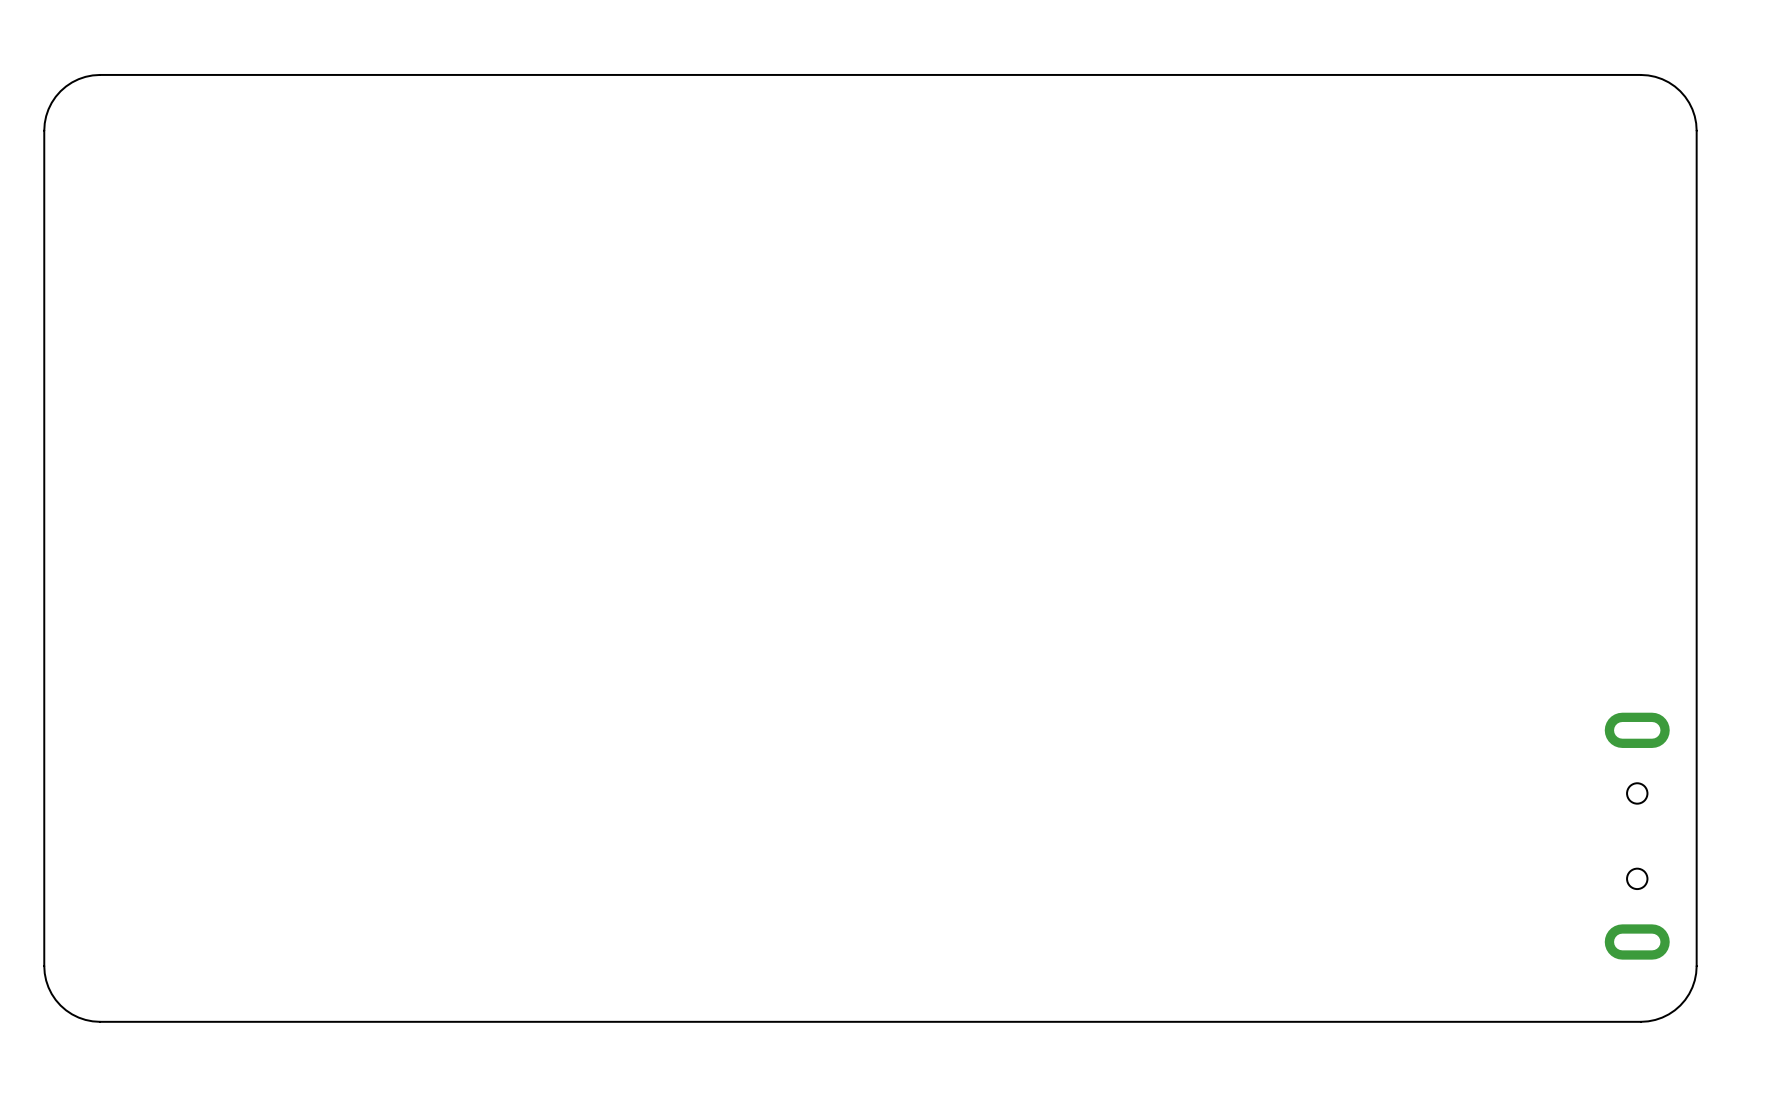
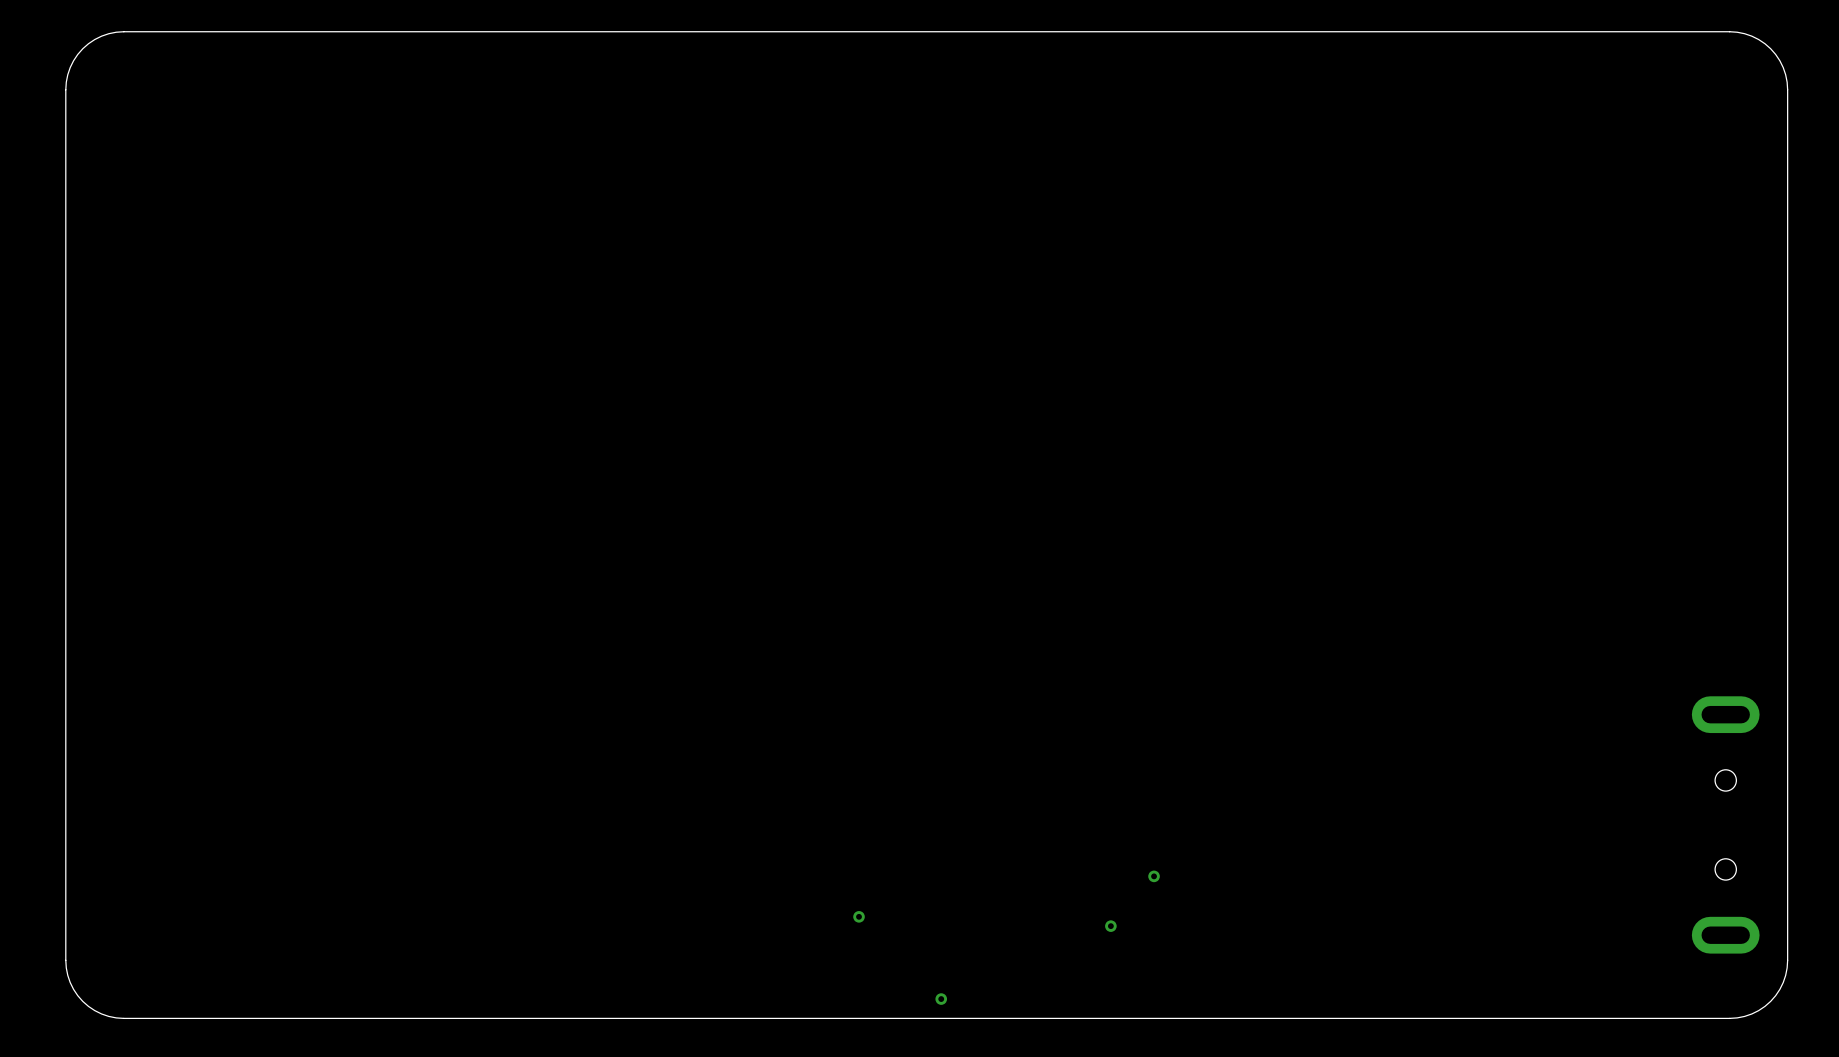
via: none -> (1154, 876)
via: none -> (859, 916)
via: none -> (1110, 926)
via: none -> (941, 999)

